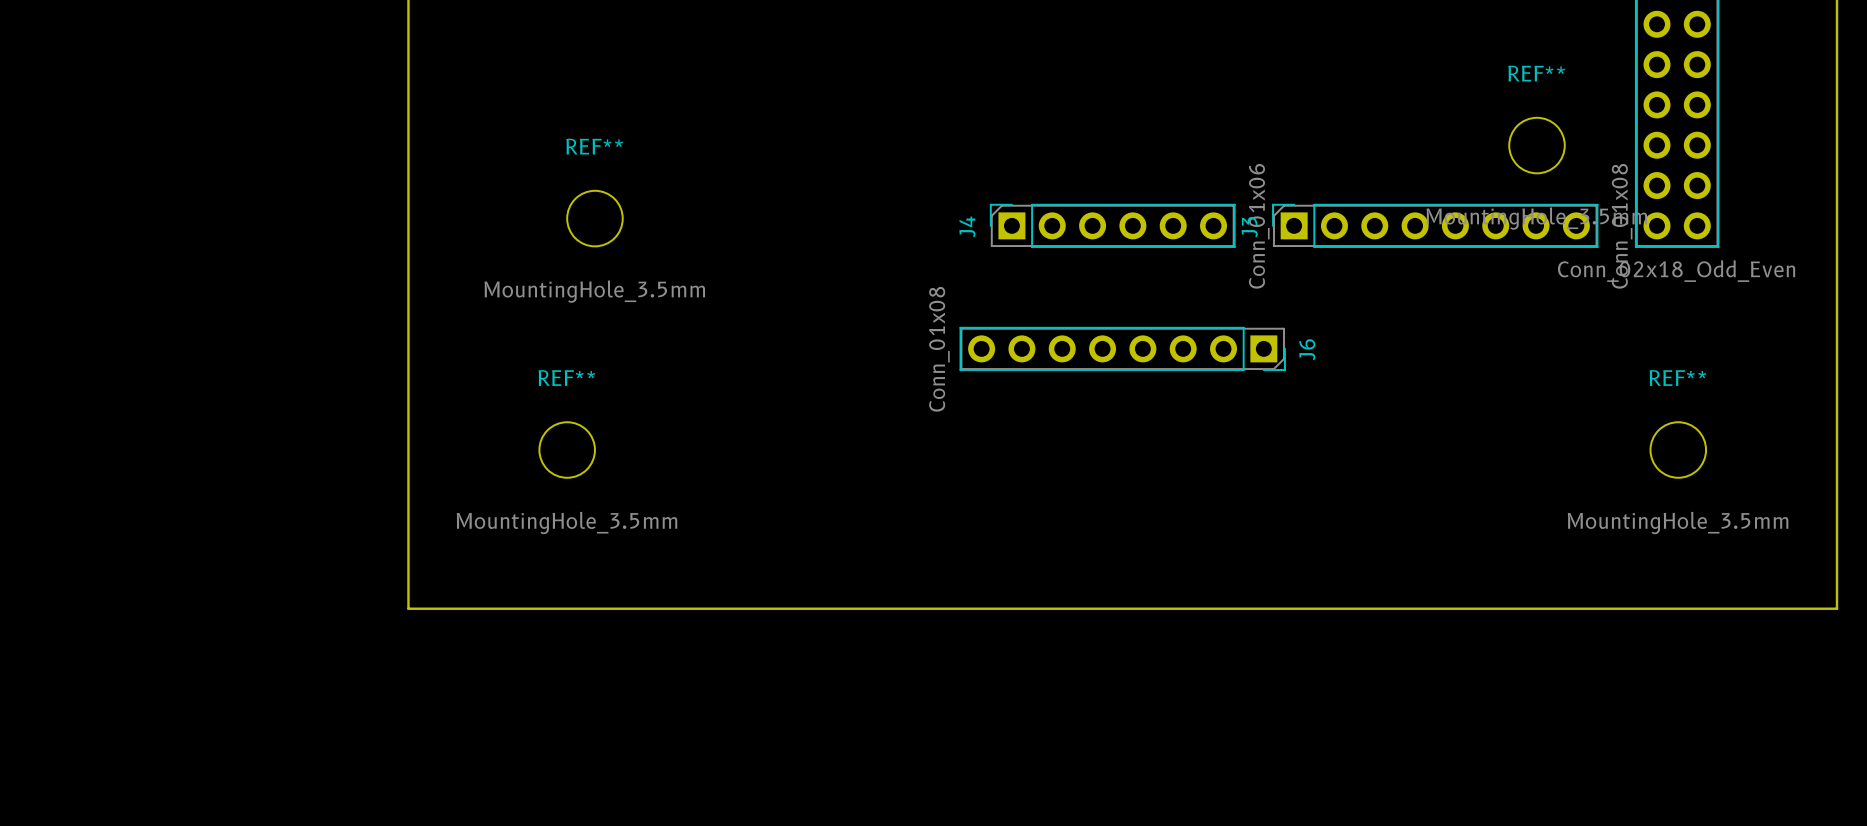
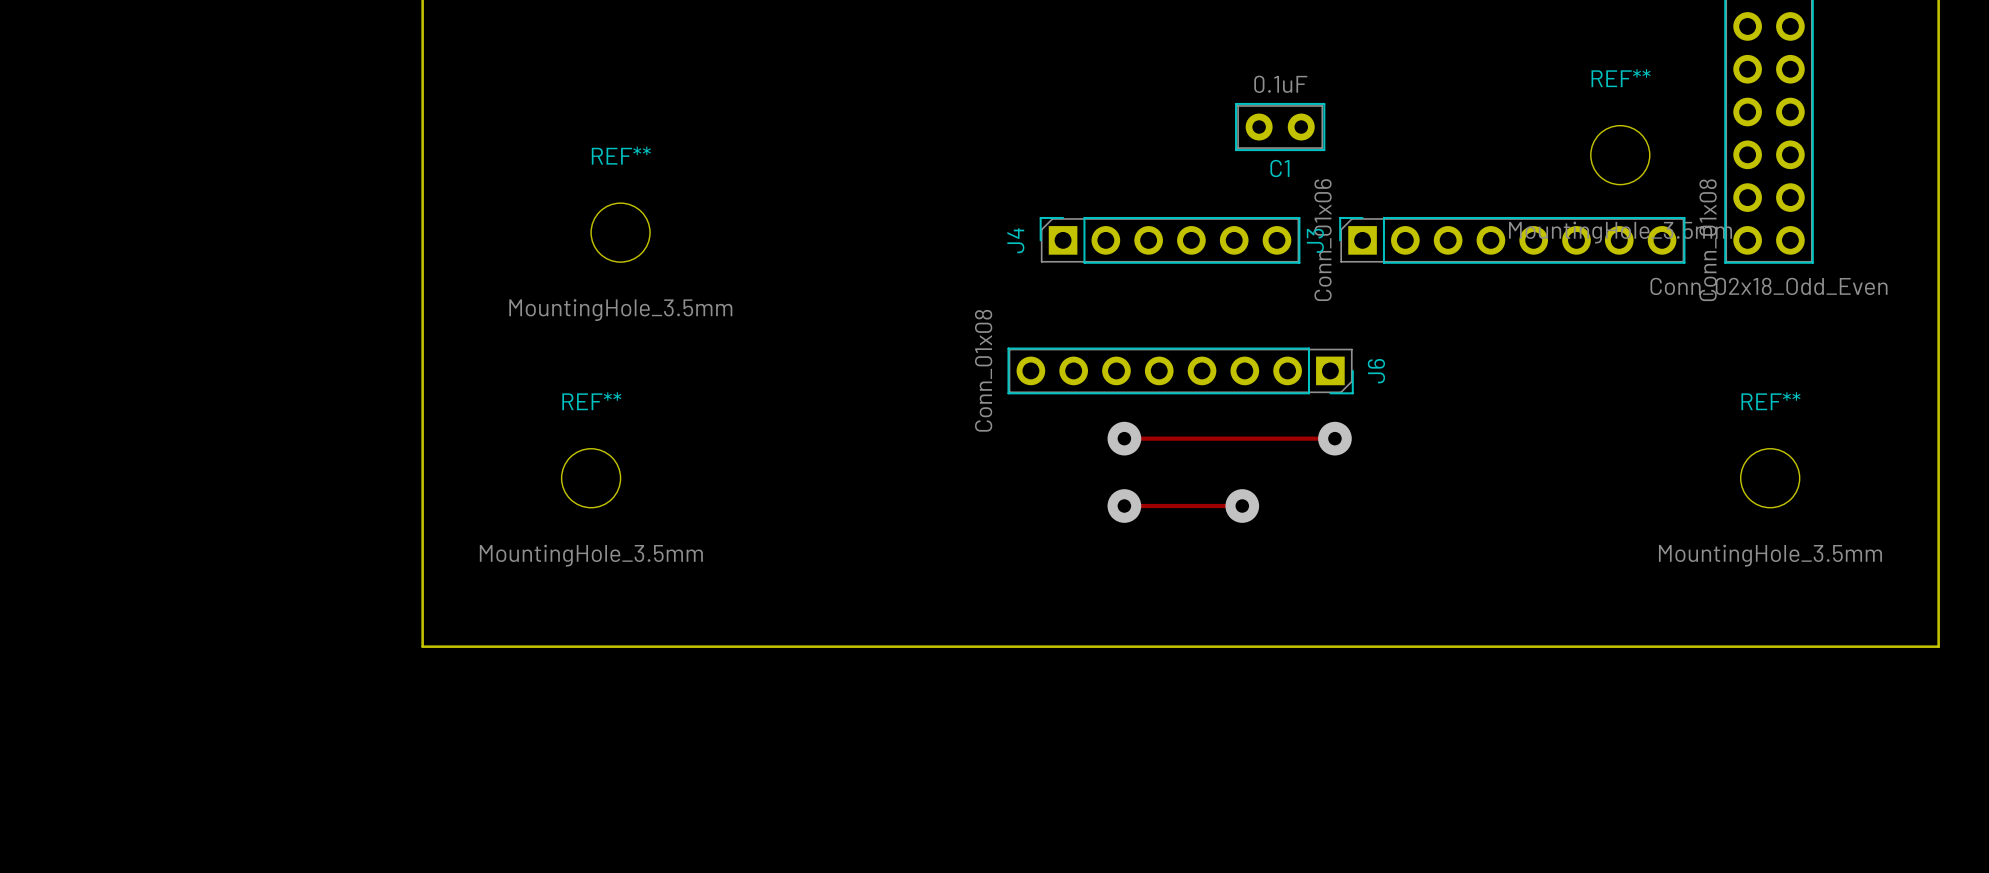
C1: none -> 0.1uF (1280, 127)
track: none -> (1124, 438) (1334, 438)
via: none -> (1124, 438)
via: none -> (1334, 438)
track: none -> (1124, 506) (1242, 506)
via: none -> (1124, 506)
via: none -> (1242, 506)

